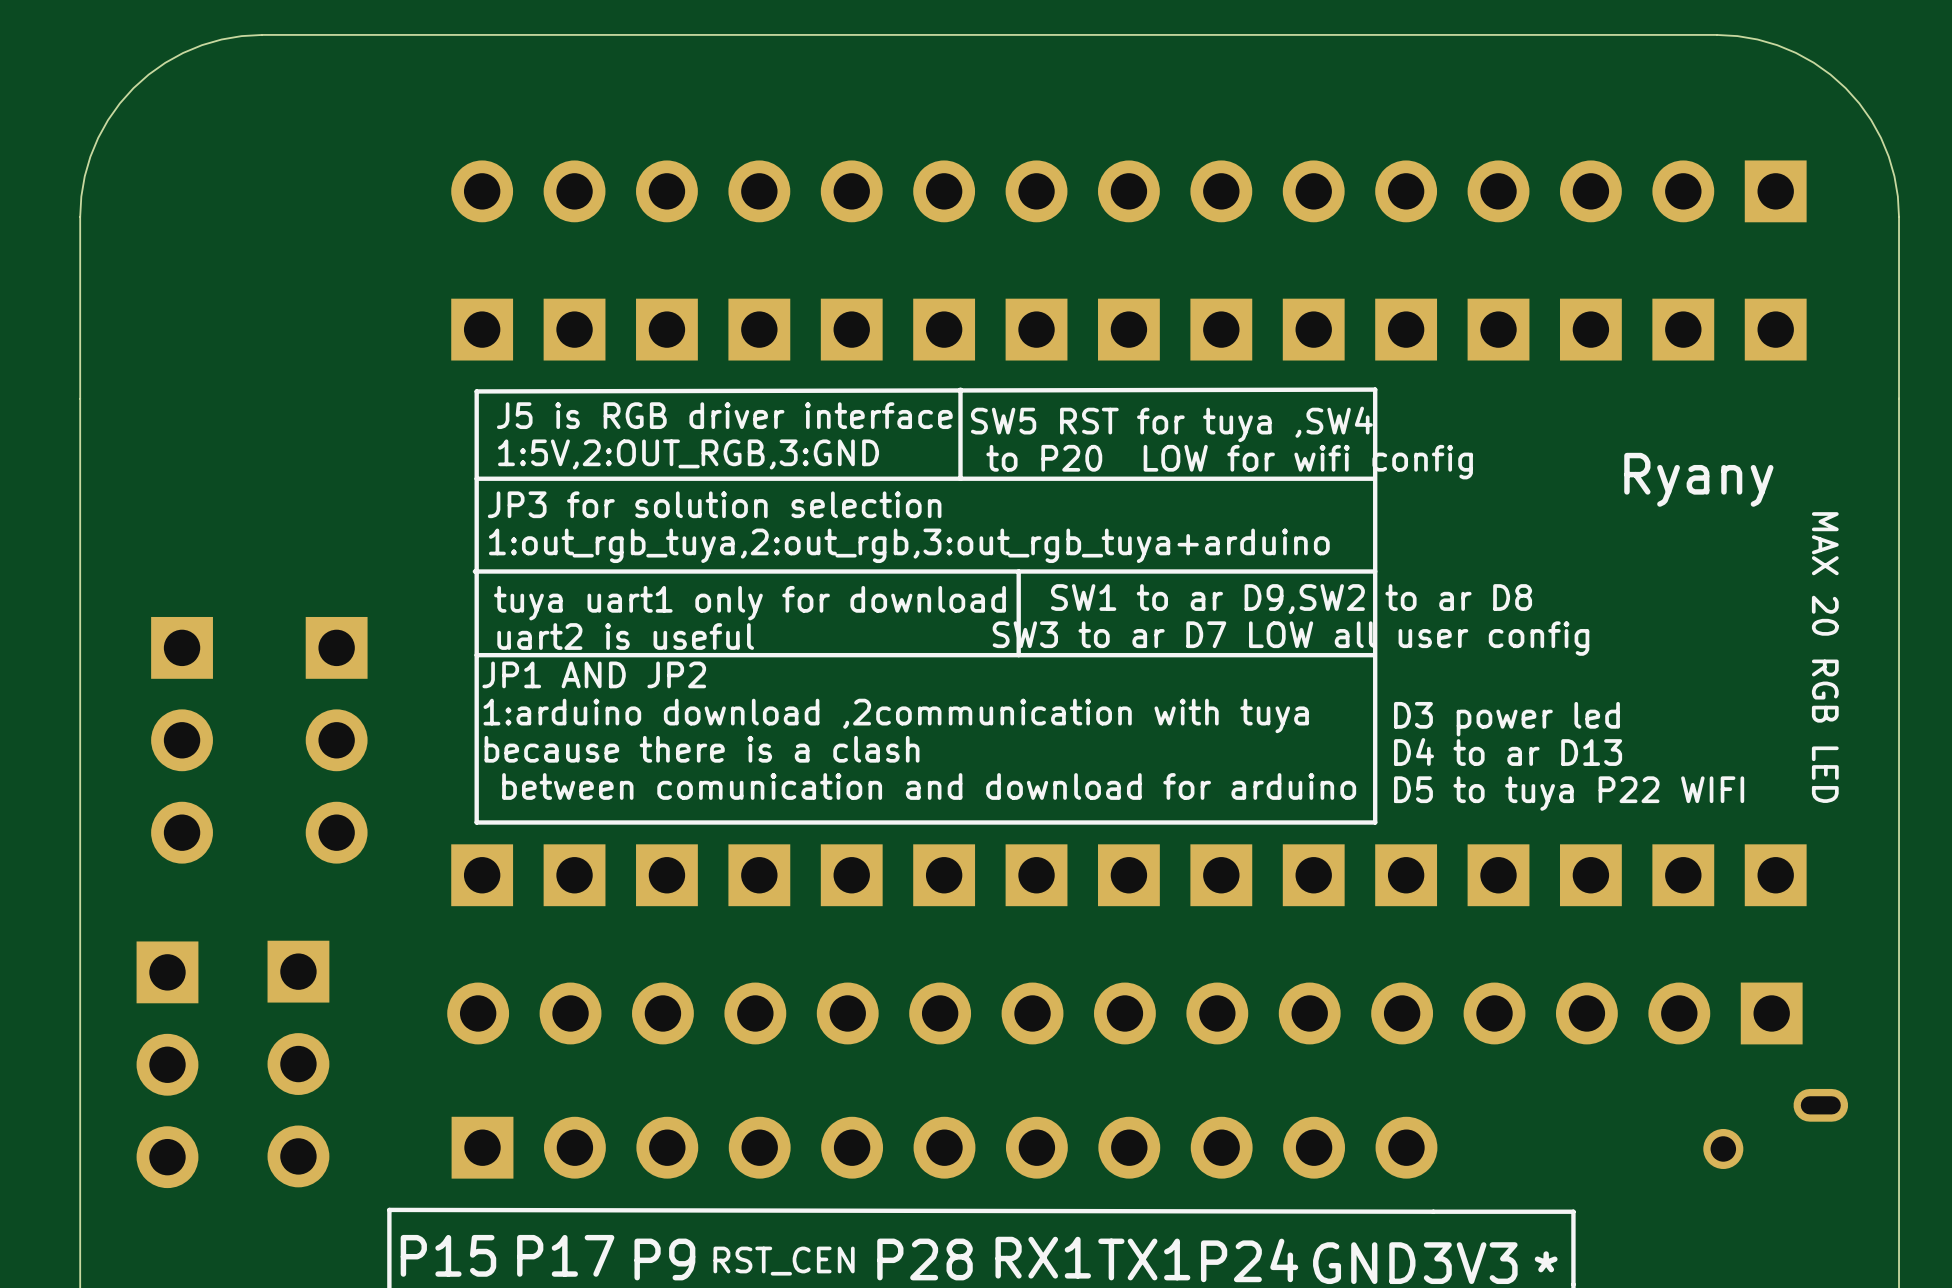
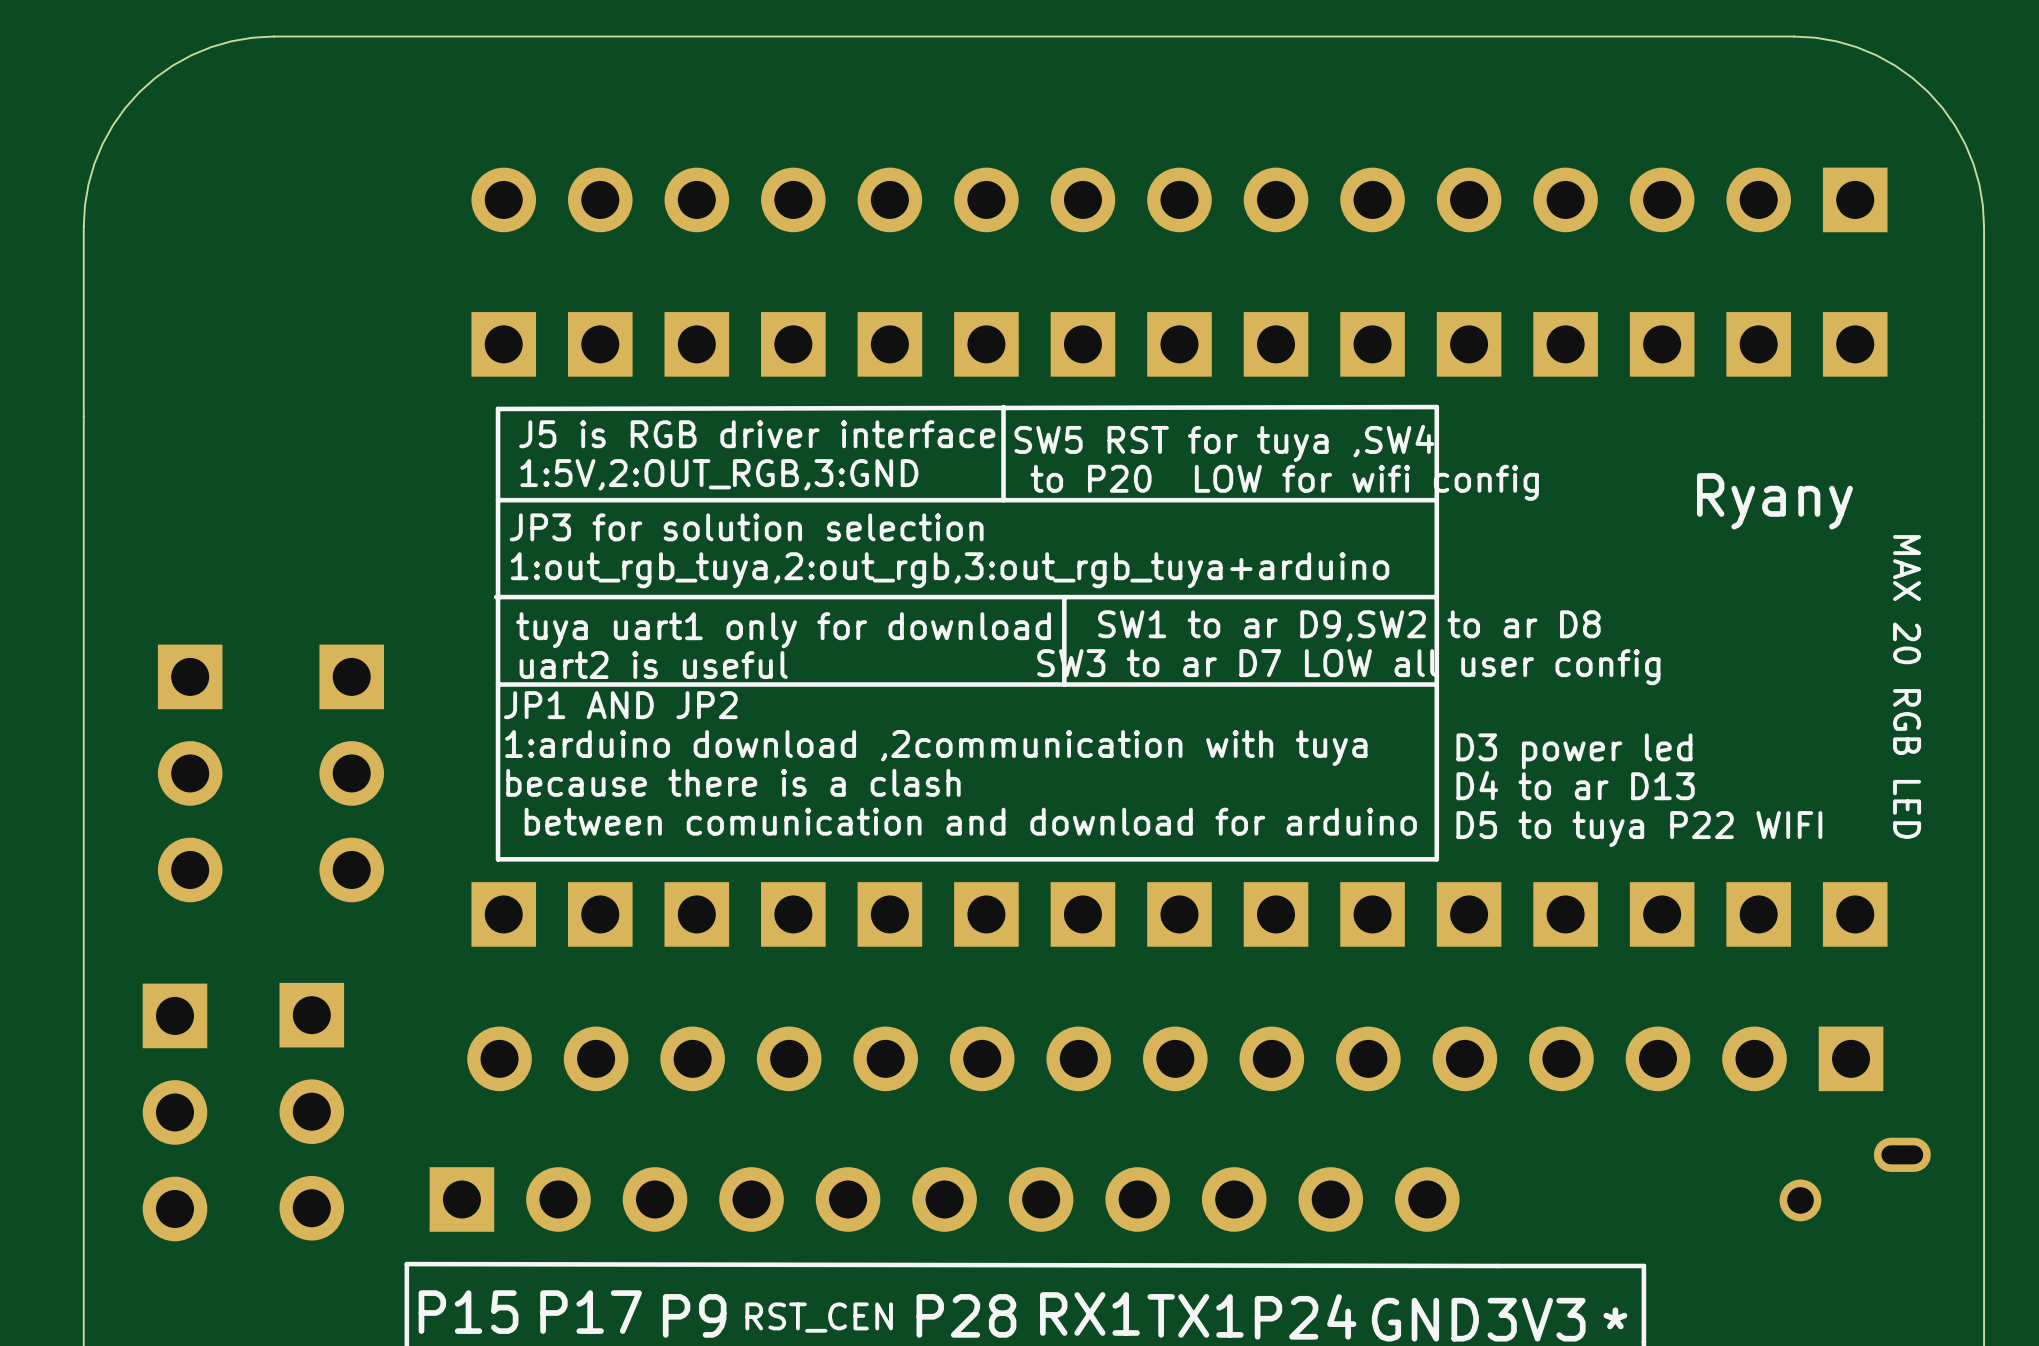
part position: (944, 1147) -> (944, 1199)

